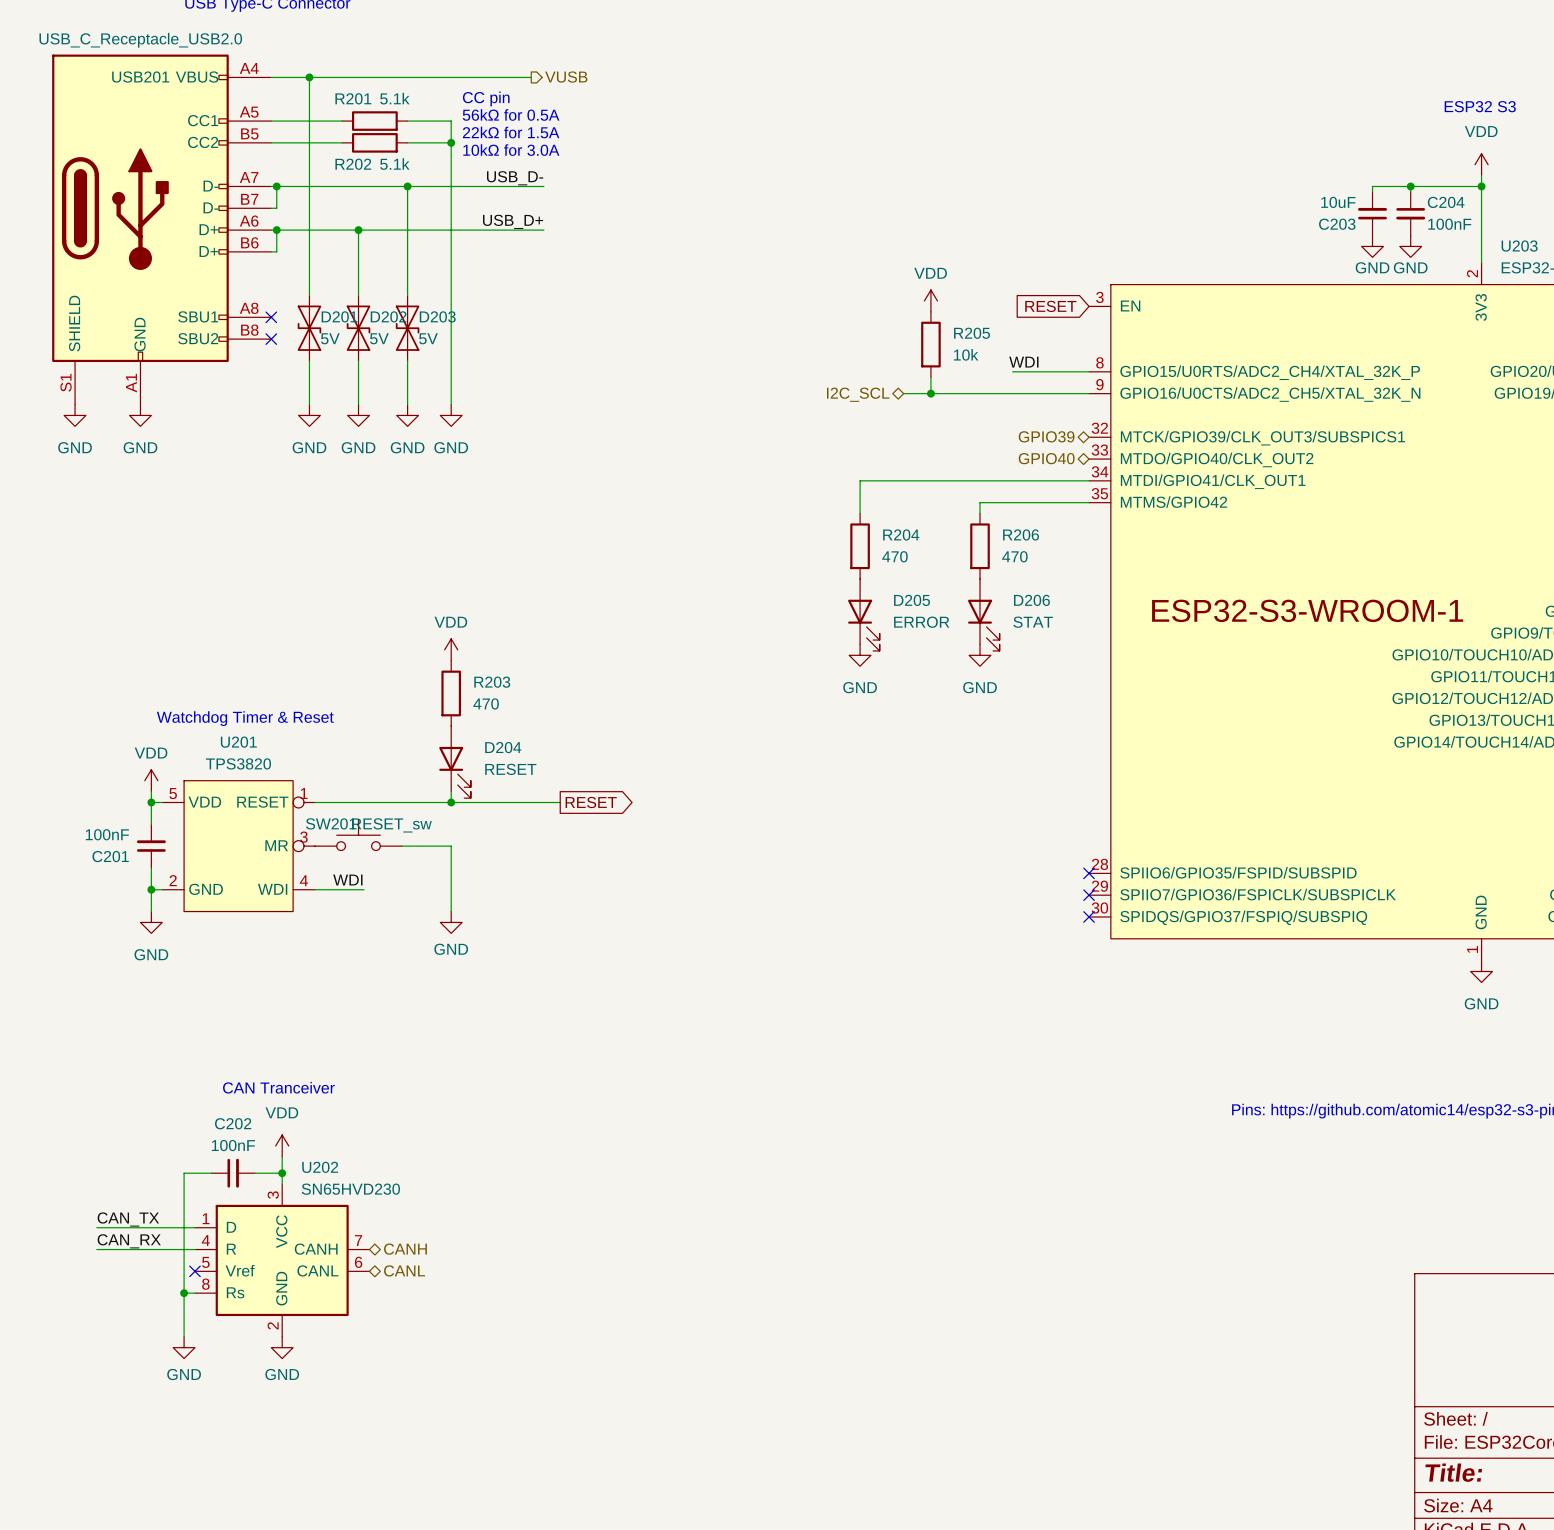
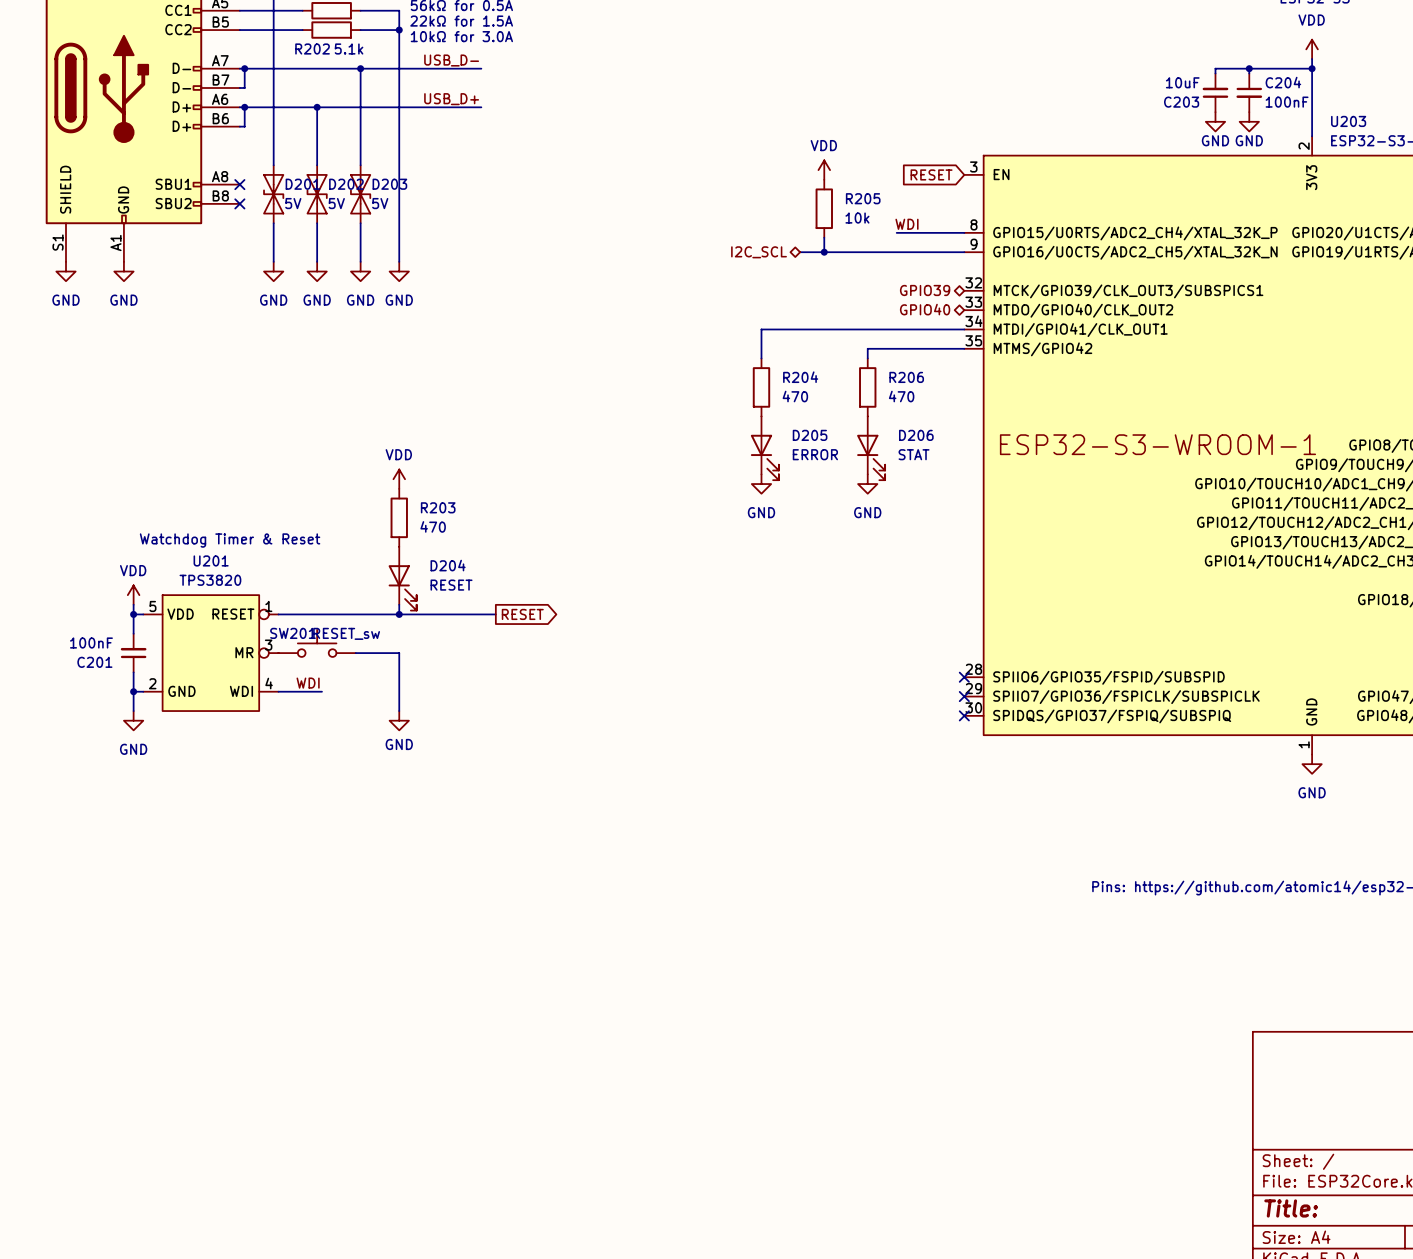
text: CAN Tranceiver (278, 1087) -> none
power symbol: VDD (282, 1145) -> none
wire: (282, 1156) (282, 1184) -> none
wire: (211, 1173) (184, 1173) (184, 1336) -> none
C202: 100nF (233, 1173) -> none
wire: (254, 1173) (282, 1173) -> none
junction: (282, 1173) -> none
label: CAN_TX (128, 1219) -> none
wire: (96, 1227) (194, 1227) -> none
label: CAN_RX (129, 1241) -> none
wire: (96, 1249) (194, 1249) -> none
hierarchical label: CANH (405, 1249) -> none
U202: SN65HVD230 (282, 1260) -> none
hierarchical label: CANL (404, 1270) -> none
no-connect mark: (194, 1271) -> none
wire: (184, 1293) (194, 1293) -> none
junction: (184, 1293) -> none
power symbol: GND (184, 1347) -> none
power symbol: GND (282, 1347) -> none

